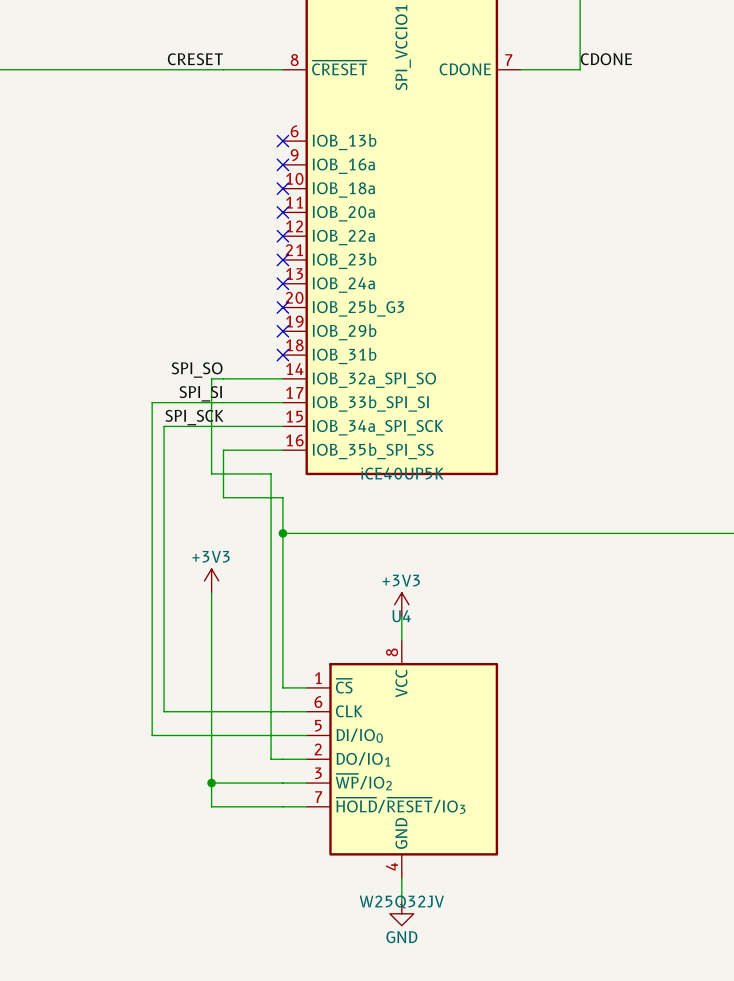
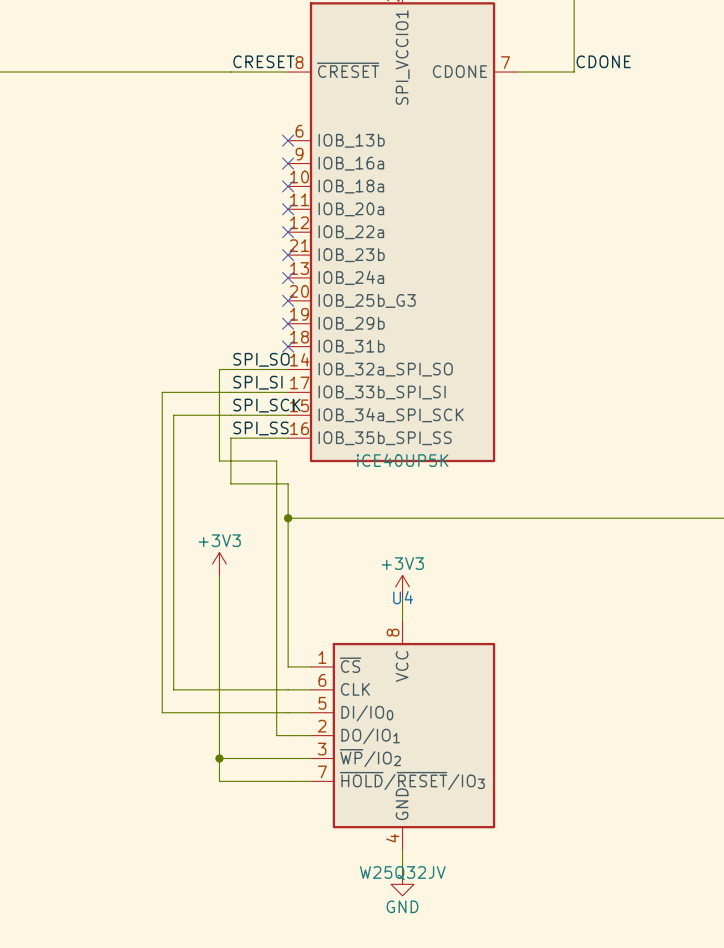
label position: CRESET (195, 59) -> CRESET (263, 61)
label position: SPI_SO (197, 370) -> SPI_SO (261, 359)
label position: SPI_SI (200, 393) -> SPI_SI (257, 382)
label position: SPI_SCK (194, 417) -> SPI_SCK (266, 405)
label: none -> SPI_SS (260, 428)

